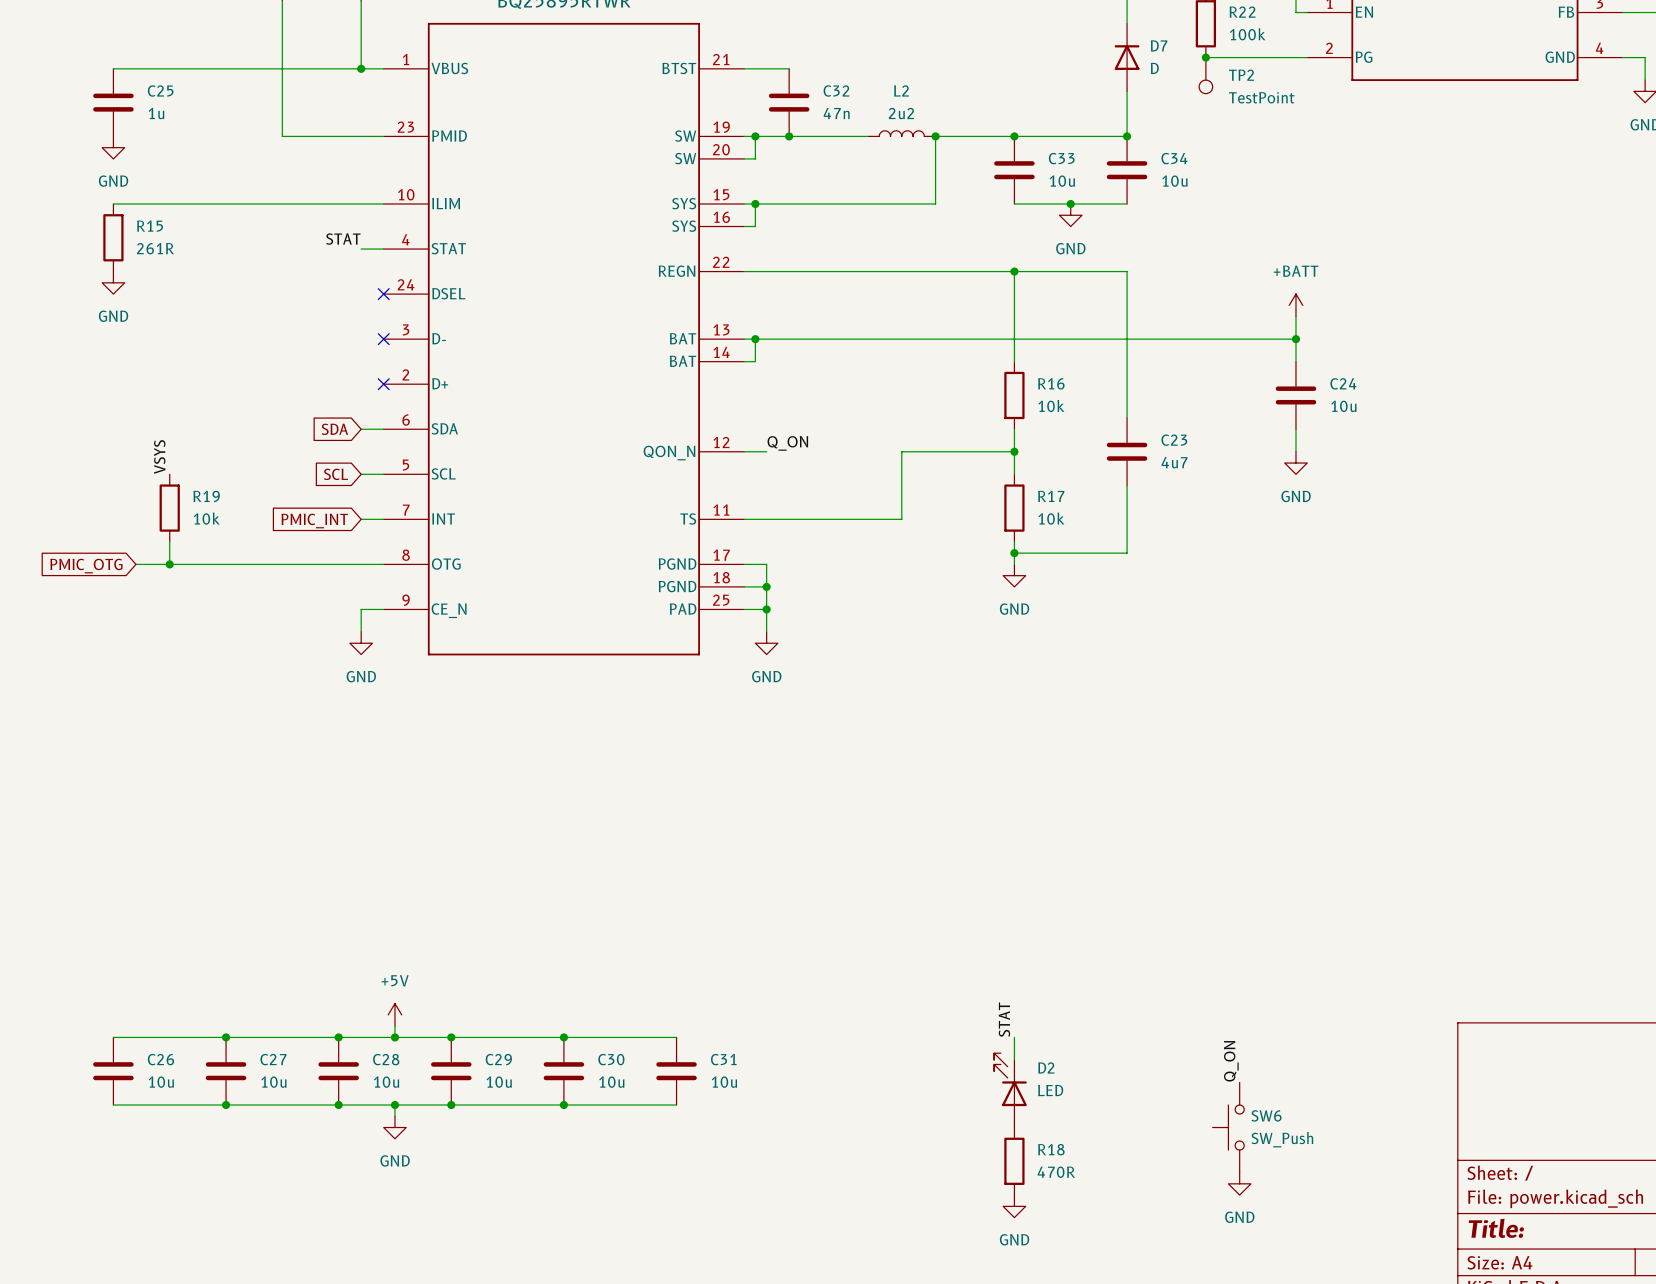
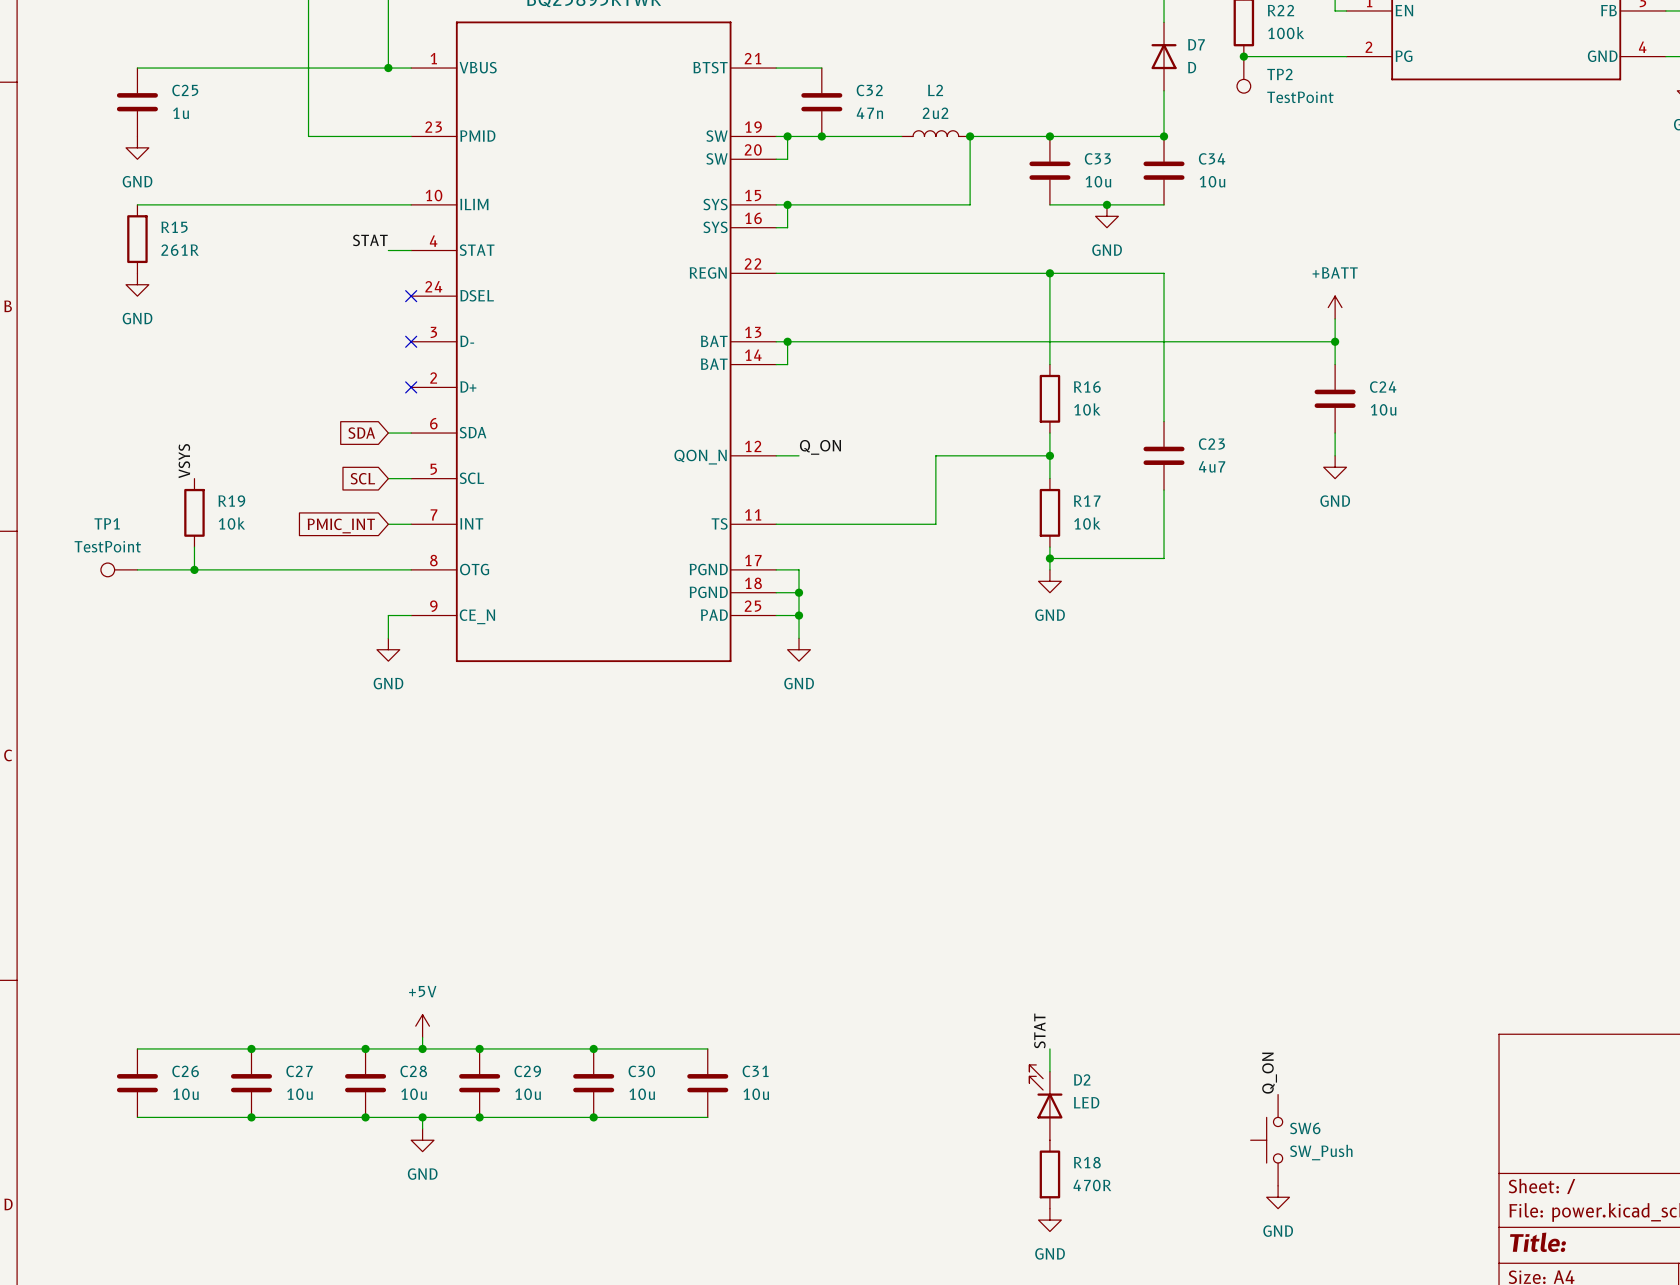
TP1: none -> TestPoint (119, 569)
wire: none -> (137, 569) (160, 569)
global label: PMIC_OTG (86, 566) -> none

